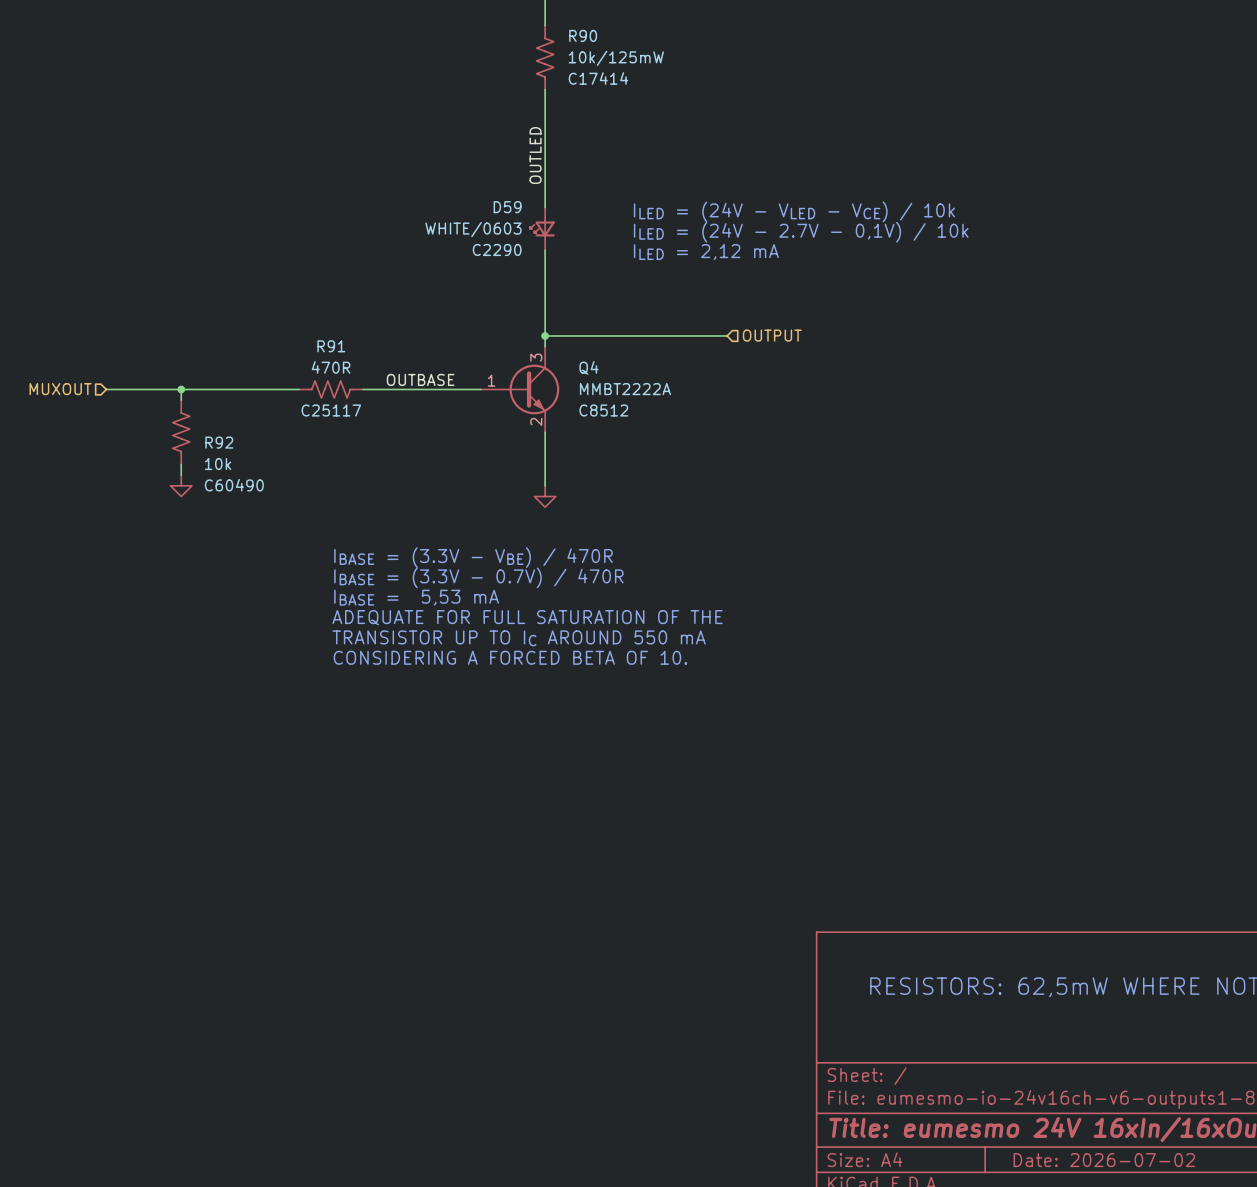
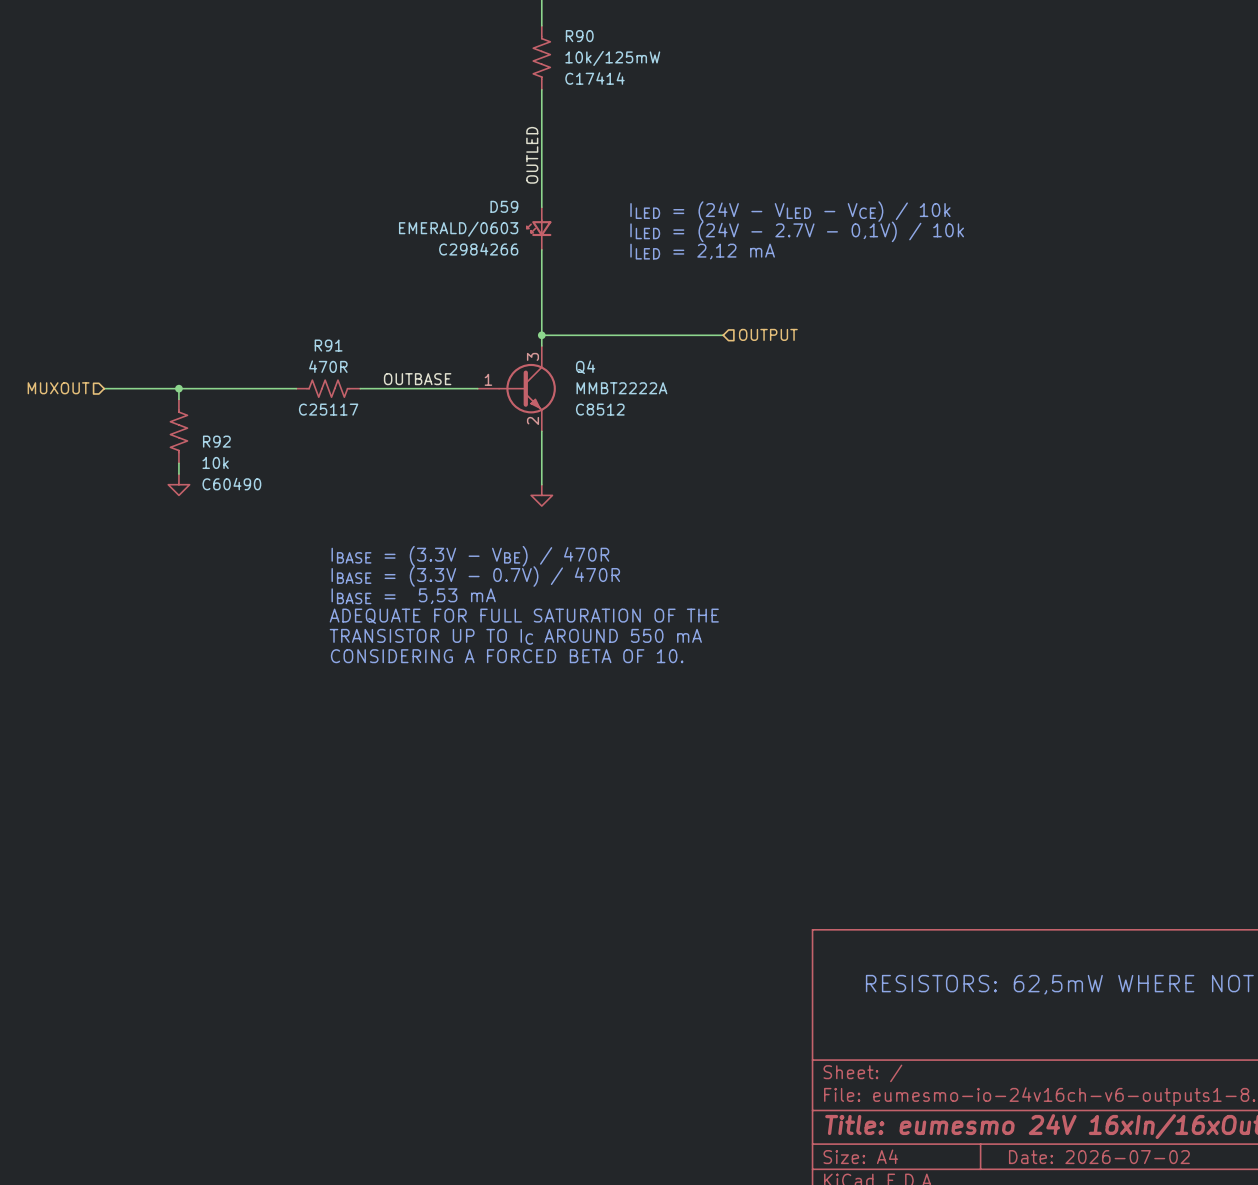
D59 value: WHITE/0603 (473, 229) -> EMERALD/0603 (458, 229)
D59 text: C2290 (497, 249) -> C2984266 (478, 249)

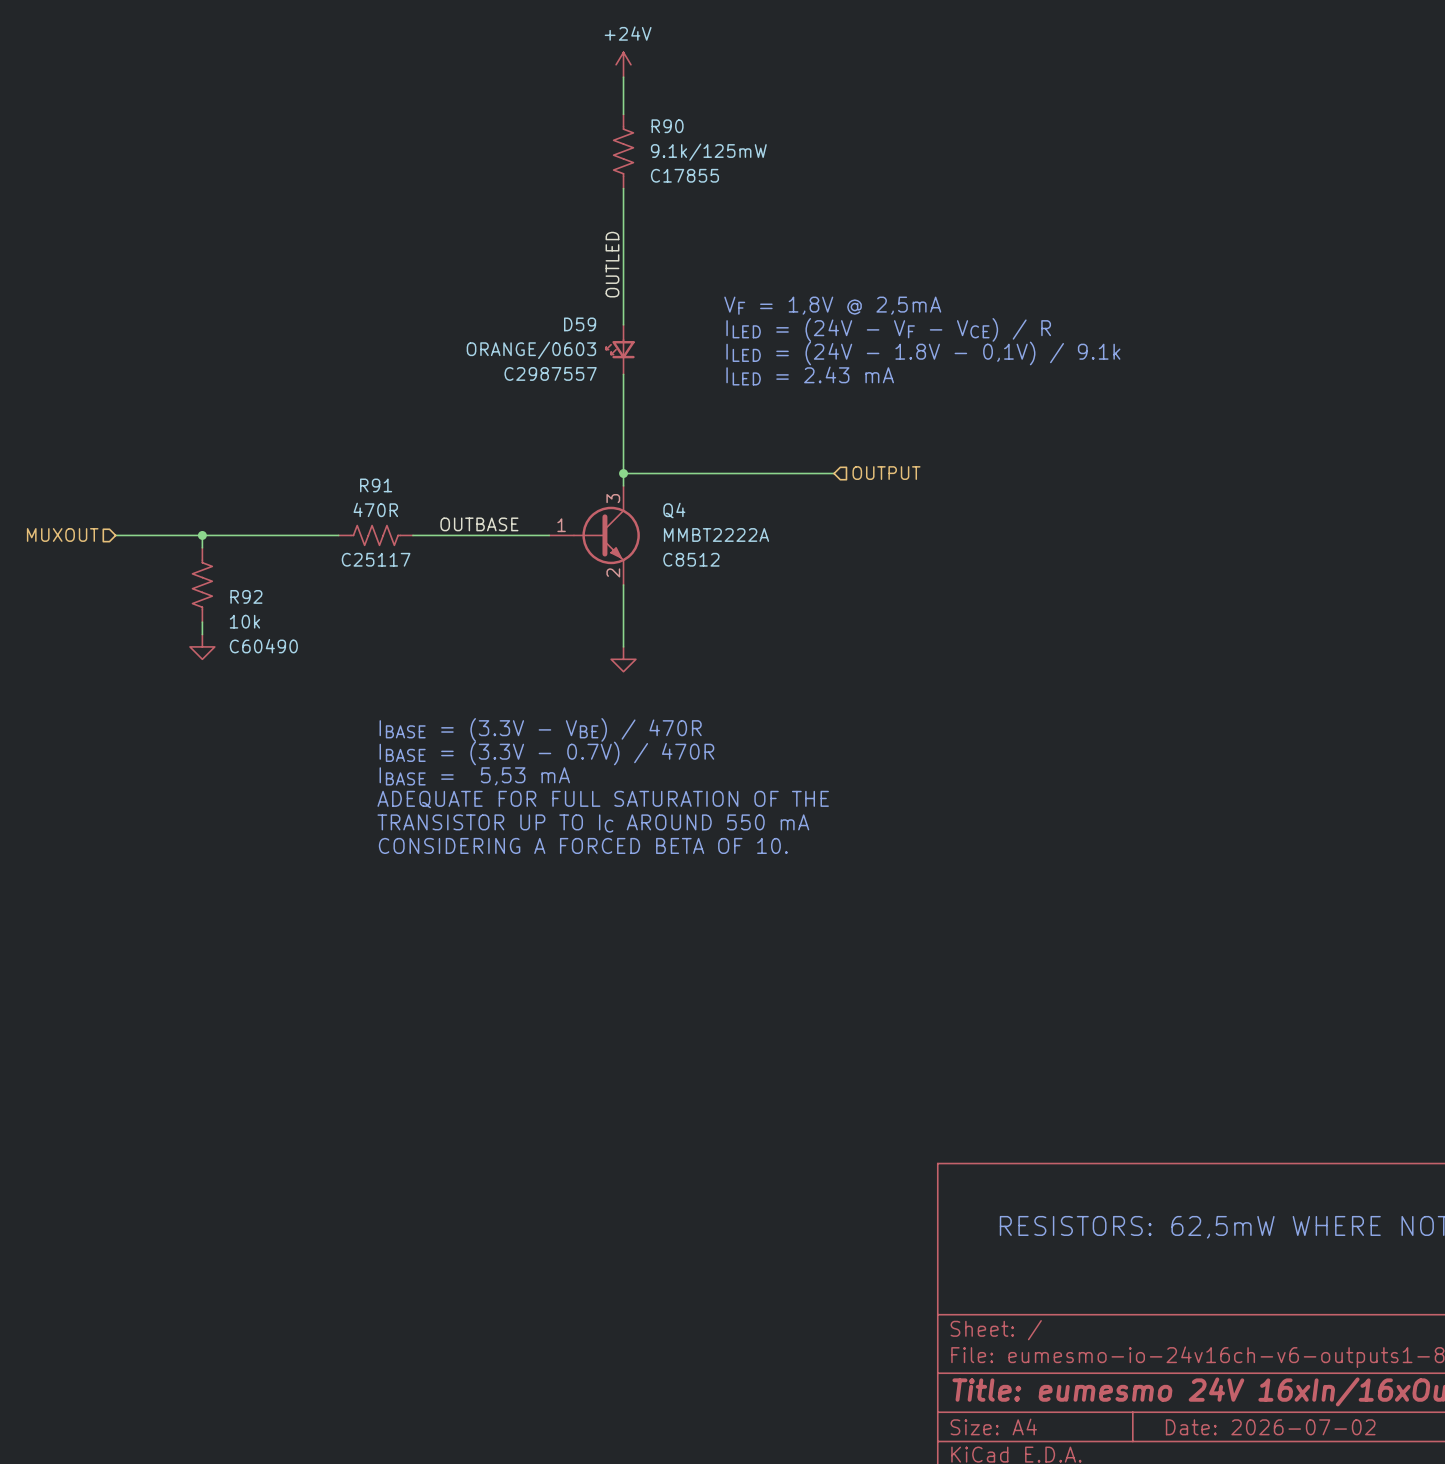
R90 value: 10k/125mW (612, 58) -> 9.1k/125mW (708, 152)
R90 text: C17414 (594, 78) -> C17855 (684, 175)
text: none -> VF = 1,8V @ 2,5mA (832, 305)
text: ILED = (24V - VLED - VCE) / 10k (790, 211) -> ILED = (24V - VF - VCE) / R (888, 329)
D59 value: EMERALD/0603 (458, 229) -> ORANGE/0603 (531, 350)
text: ILED = (24V - 2.7V - 0,1V) / 10k (797, 231) -> ILED = (24V - 1.8V - 0,1V) / 9.1k (923, 353)
D59 text: C2984266 (478, 249) -> C2987557 (550, 373)
text: ILED = 2,12 mA (702, 251) -> ILED = 2.43 mA (810, 376)

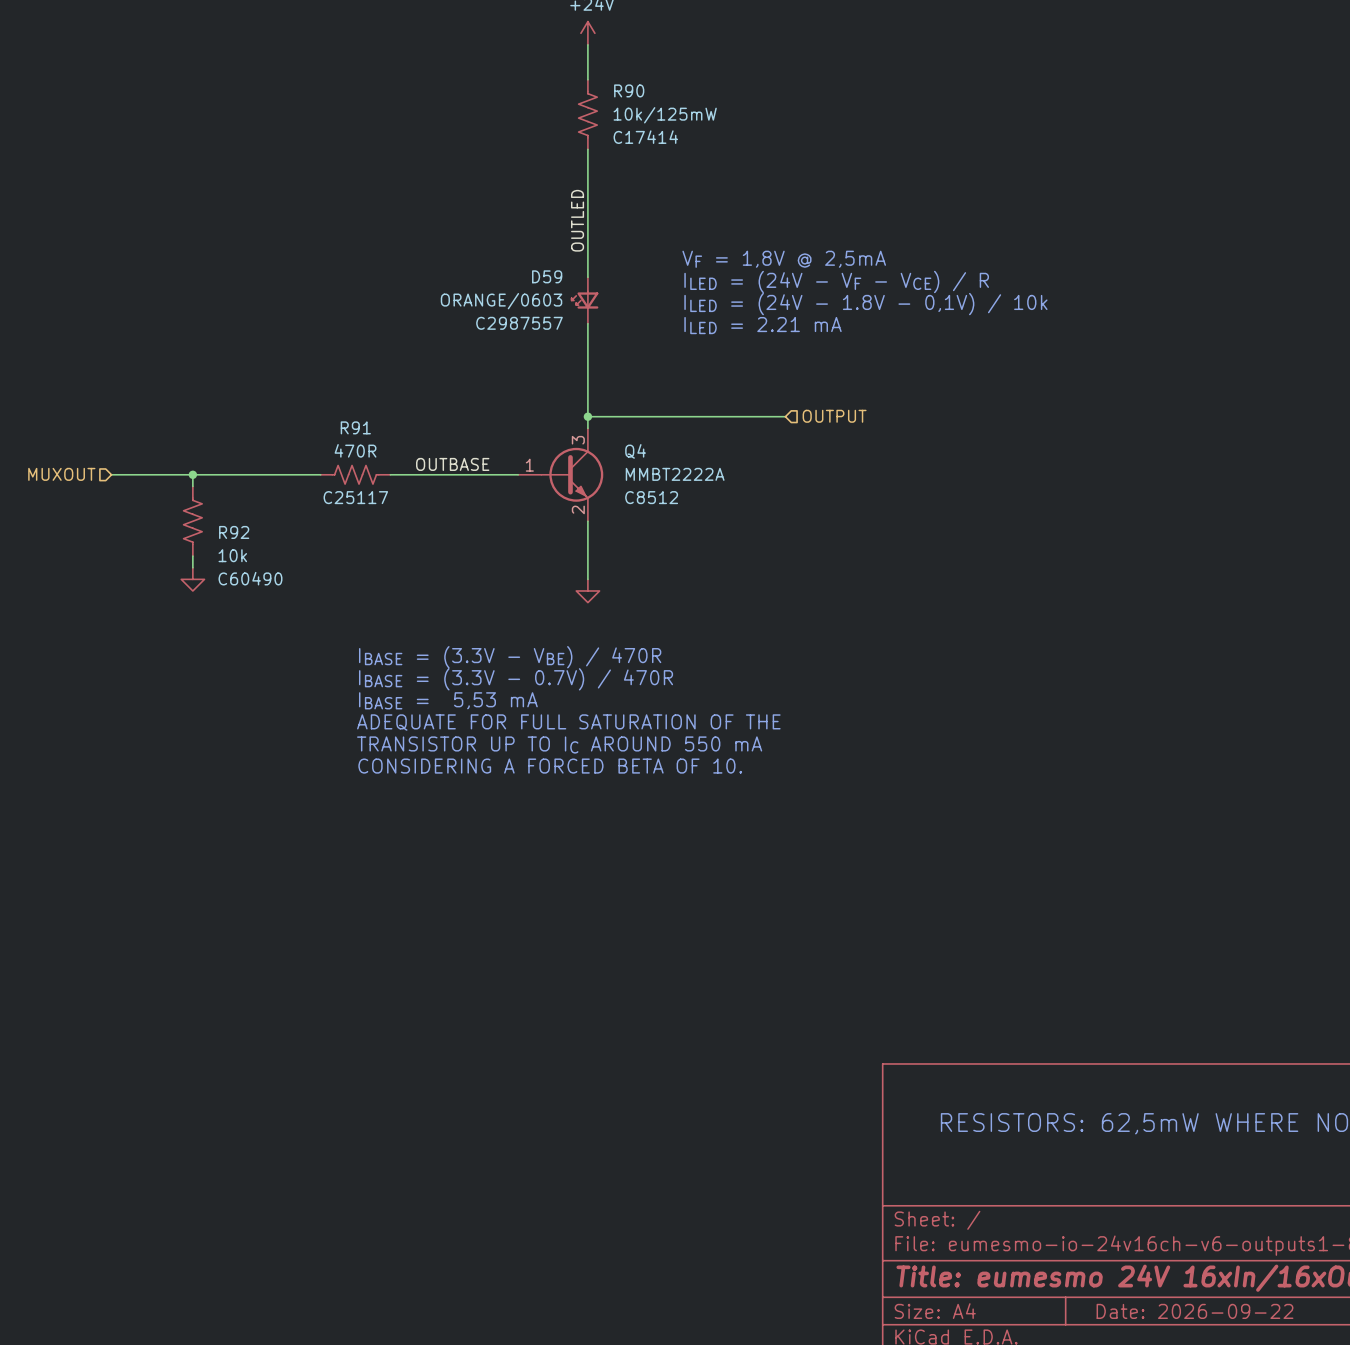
R90 value: 9.1k/125mW (708, 152) -> 10k/125mW (665, 115)
R90 text: C17855 (684, 175) -> C17414 (645, 137)
text: ILED = (24V - 1.8V - 0,1V) / 9.1k (923, 353) -> ILED = (24V - 1.8V - 0,1V) / 10k (865, 304)
text: ILED = 2.43 mA (810, 376) -> ILED = 2.21 mA (763, 325)
title block: Date: 2026-07-02 (1270, 1427) -> Date: 2026-09-22 (1195, 1311)

